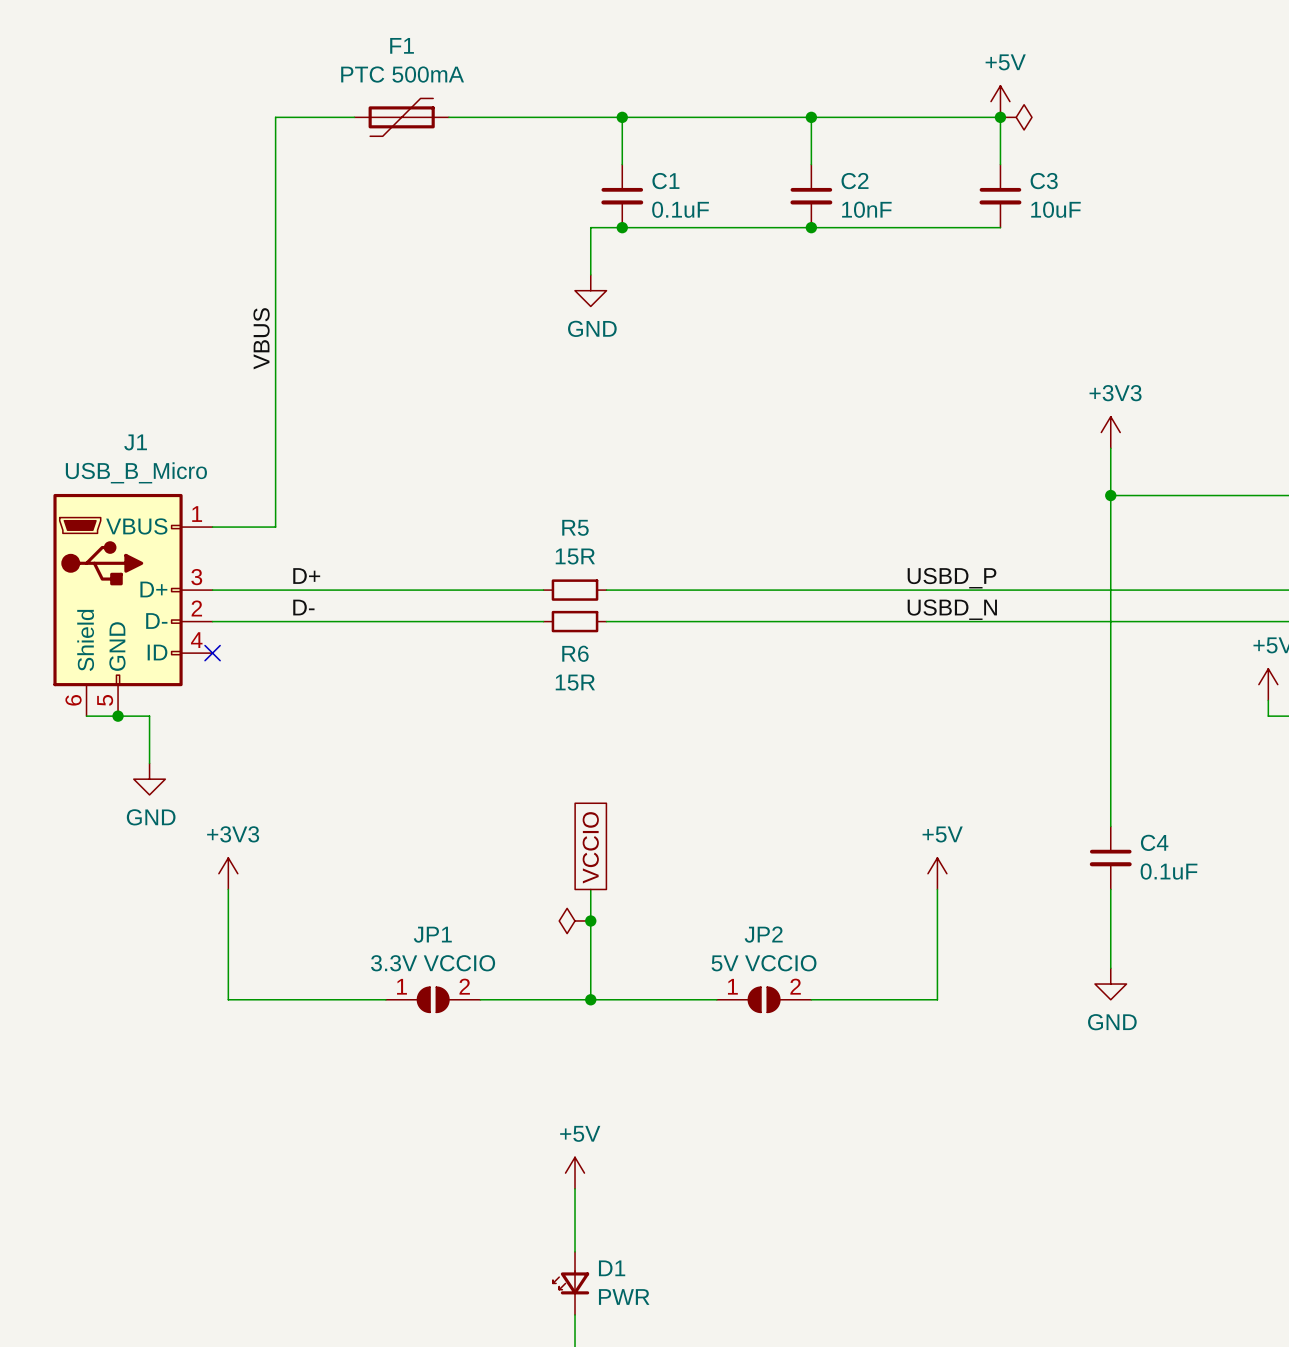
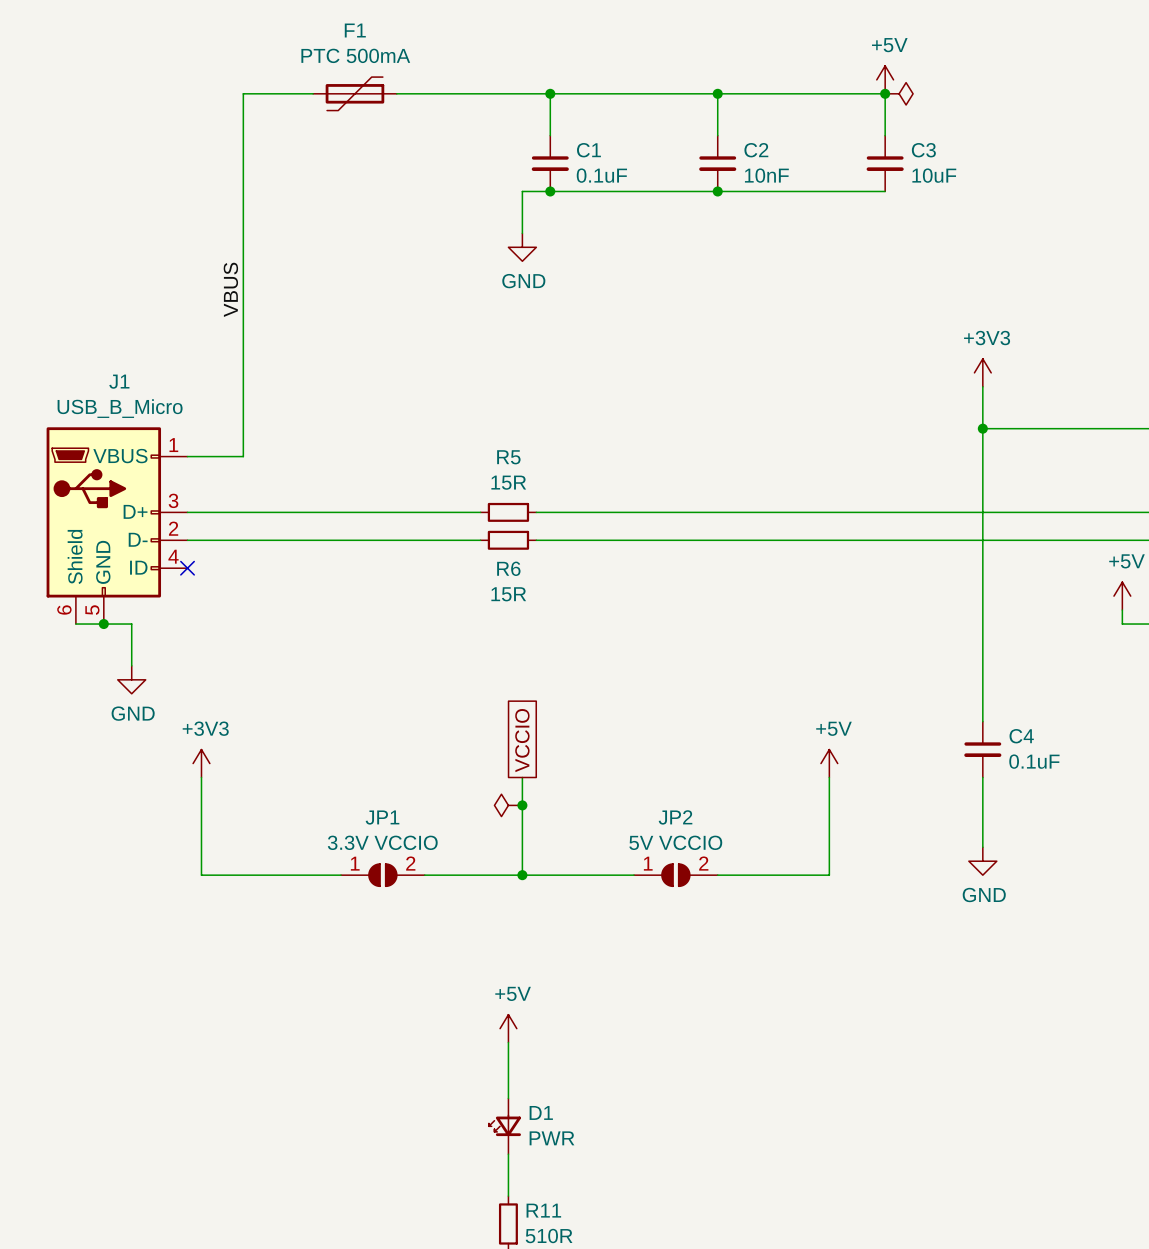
label: D+ (306, 576) -> none
label: USBD_P (952, 578) -> none
label: D- (303, 607) -> none
label: USBD_N (952, 609) -> none

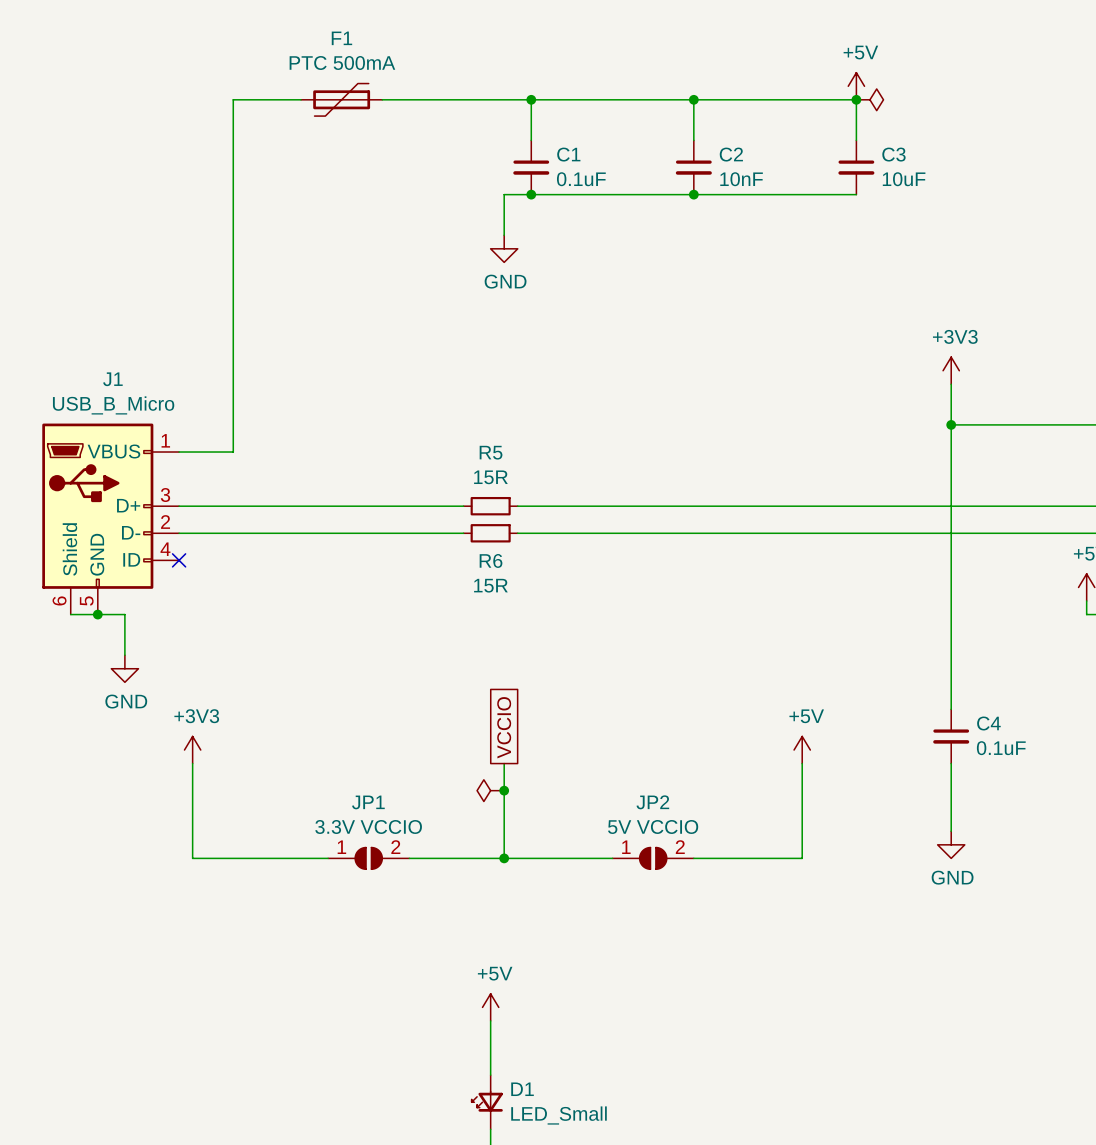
label: VBUS (230, 289) -> none
D1 value: PWR (551, 1138) -> LED_Small (559, 1115)

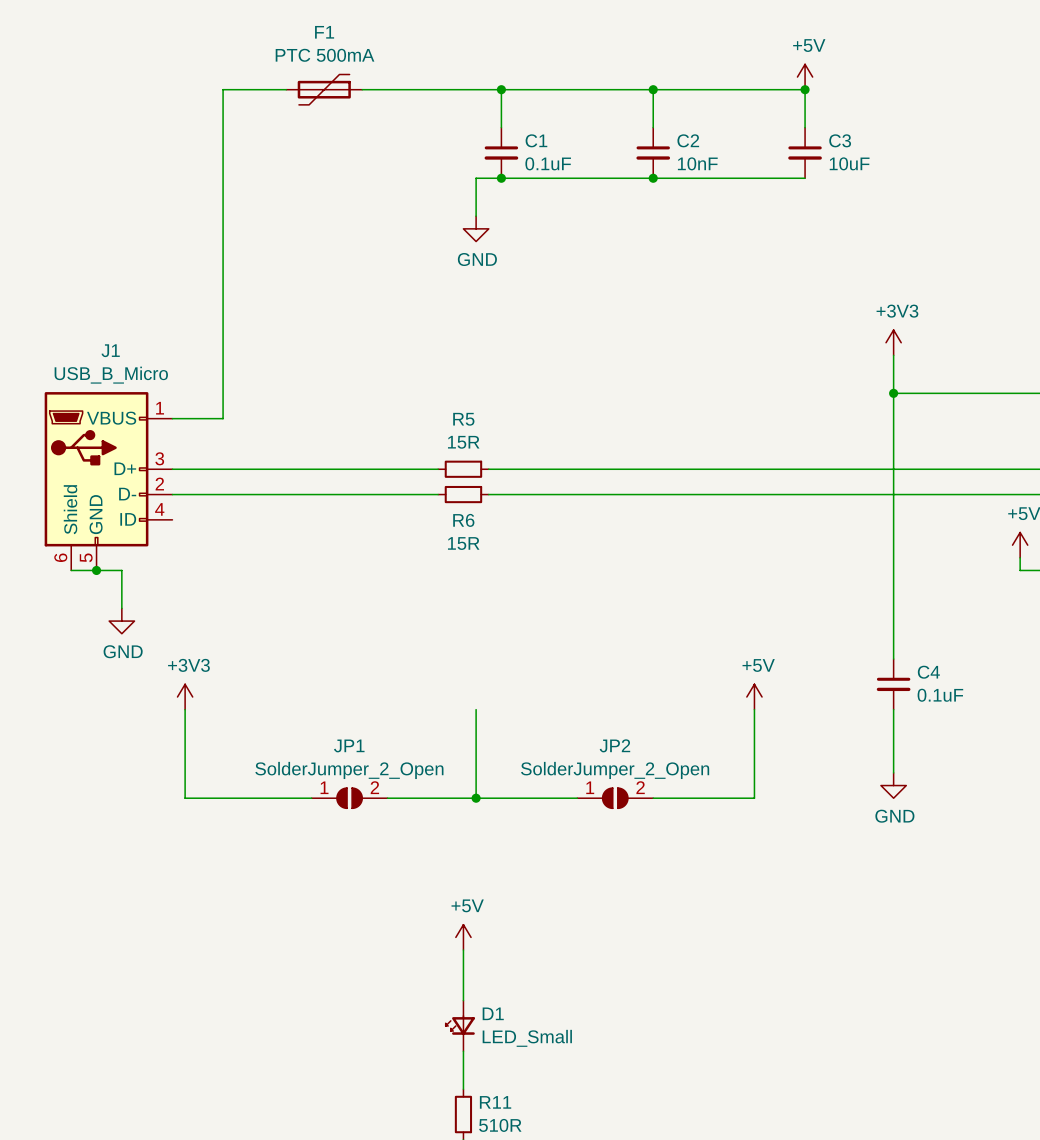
power symbol: (869, 99) -> none
no-connect mark: (179, 560) -> none
global label: VCCIO (504, 727) -> none
power symbol: (490, 790) -> none
junction: (504, 790) -> none
JP1 value: 3.3V VCCIO (368, 826) -> SolderJumper_2_Open (349, 770)
JP2 value: 5V VCCIO (653, 826) -> SolderJumper_2_Open (615, 770)

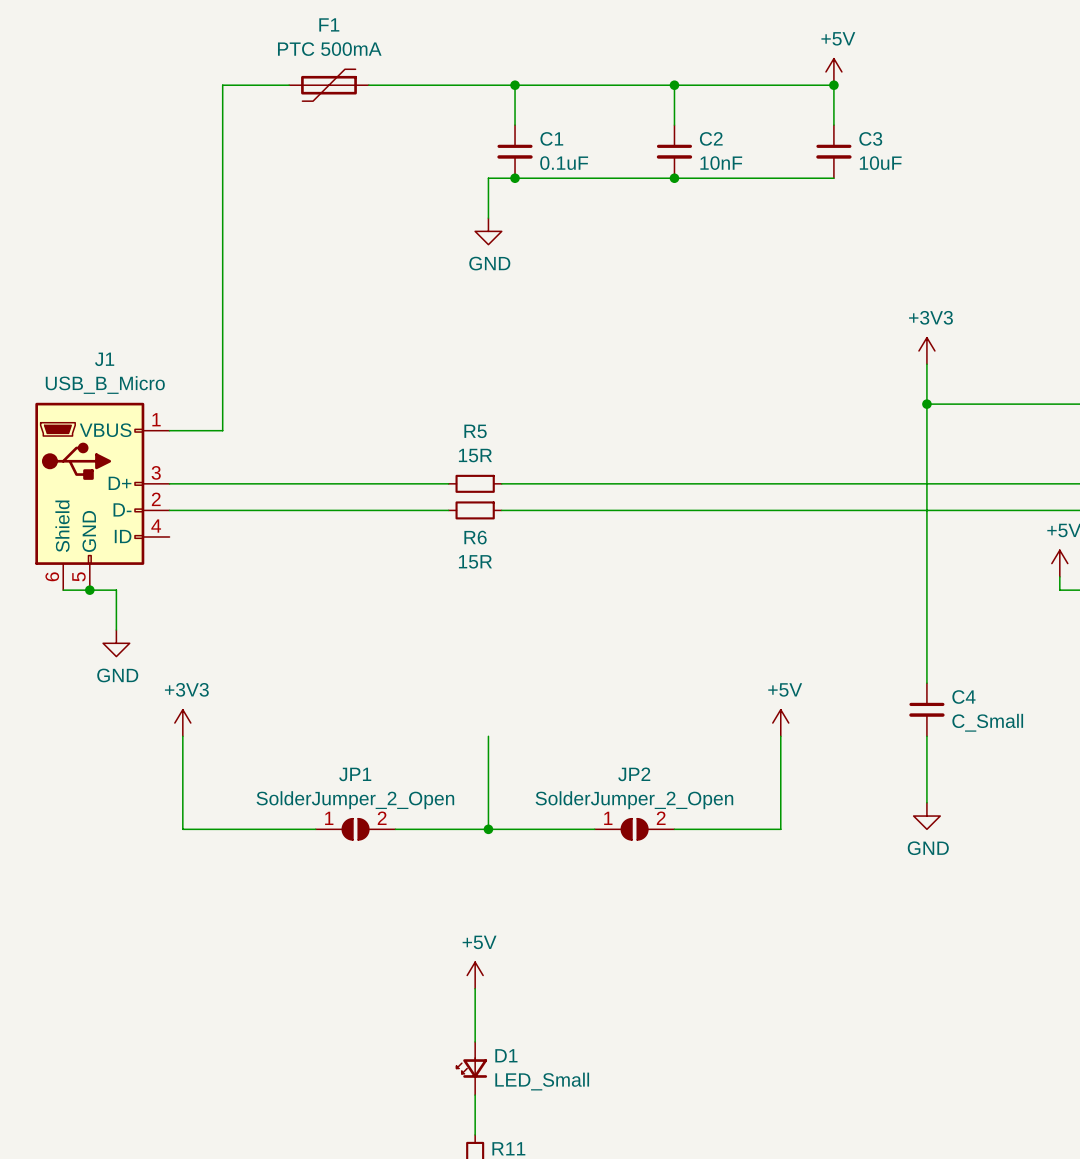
C4 value: 0.1uF (940, 695) -> C_Small (987, 722)

